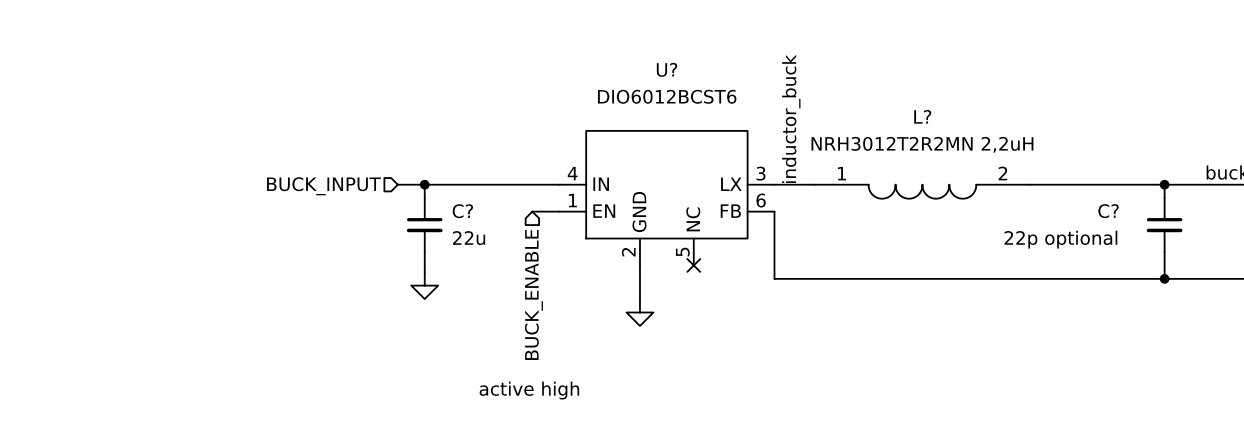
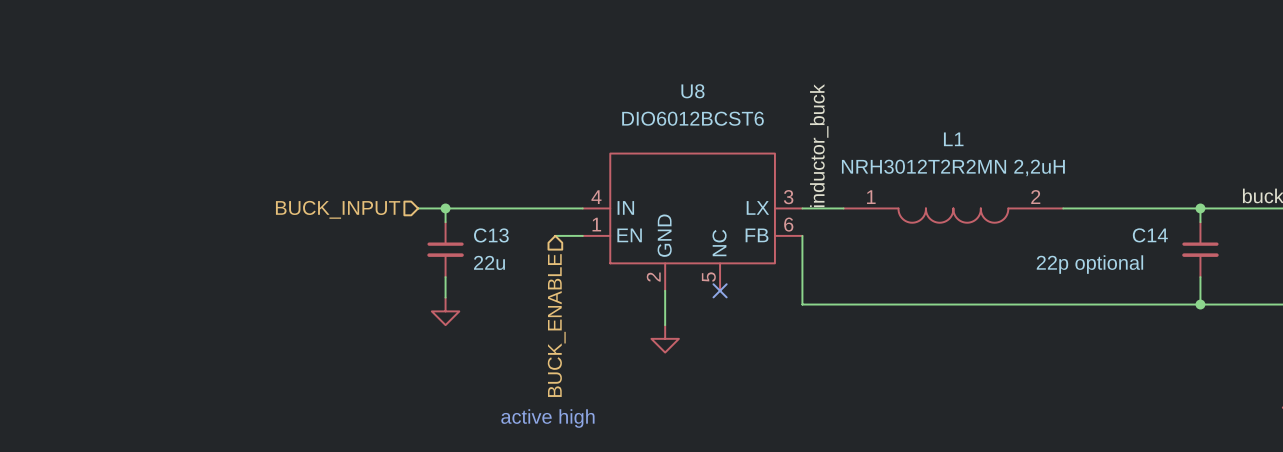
U? name: U? (667, 69) -> U8 (692, 91)
L? name: L? (922, 116) -> L1 (953, 139)
C? name: C? (462, 211) -> C13 (491, 235)
C? name: C? (1108, 211) -> C14 (1150, 235)

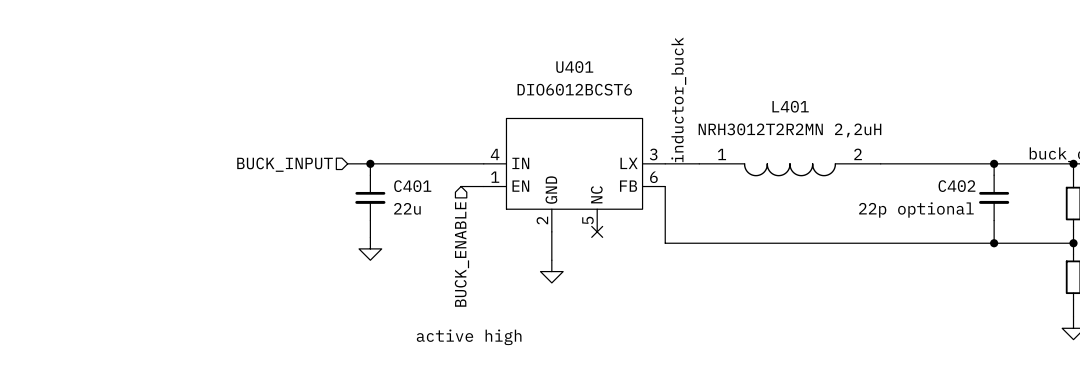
U8 name: U8 (692, 91) -> U401 (574, 67)
L1 name: L1 (953, 139) -> L401 (790, 106)
C13 name: C13 (491, 235) -> C401 (412, 186)
C14 name: C14 (1150, 235) -> C402 (956, 186)

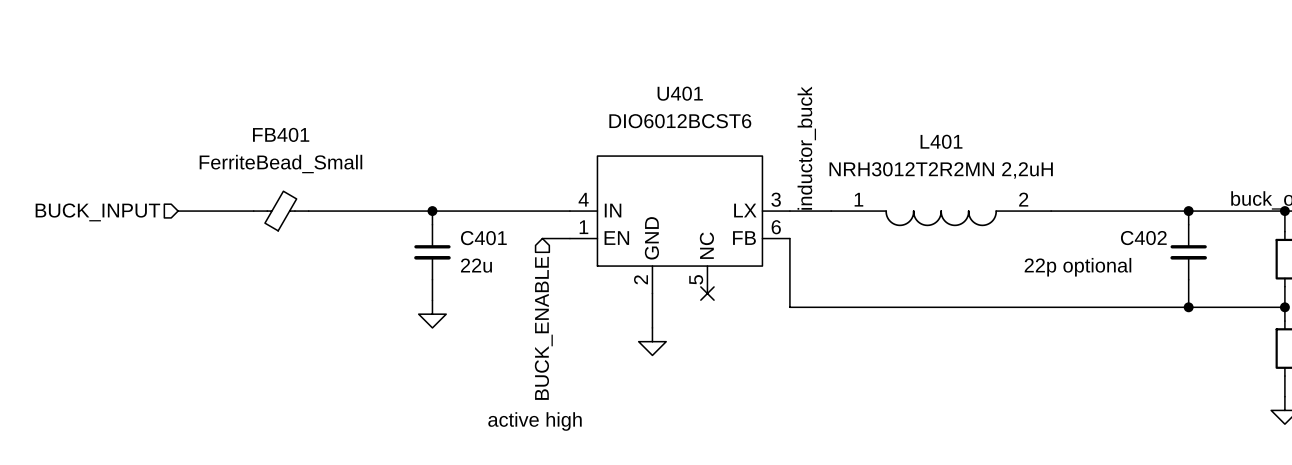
wire: none -> (178, 211) (253, 211)
FB401: none -> FerriteBead_Small (281, 211)
wire: none -> (308, 211) (404, 211)
hierarchical label position: BUCK_INPUT (285, 164) -> BUCK_INPUT (97, 212)

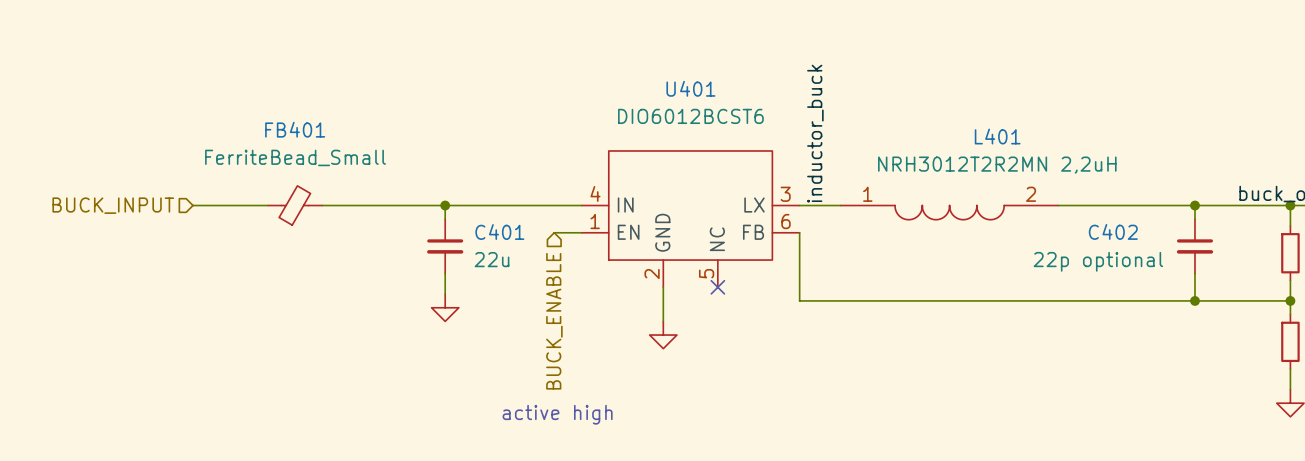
L401 name position: L401 (941, 141) -> L401 (997, 136)
L401 value position: NRH3012T2R2MN 2,2uH (941, 170) -> NRH3012T2R2MN 2,2uH (997, 165)
C402 name position: C402 (1143, 238) -> C402 (1113, 231)

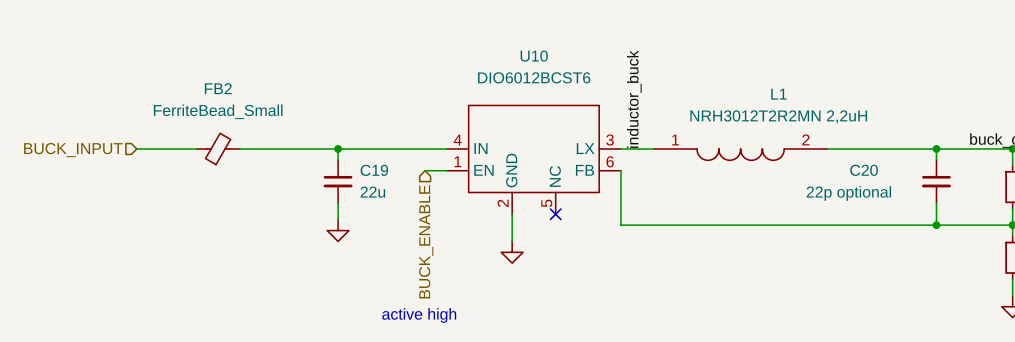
U401 name: U401 (690, 88) -> U10 (534, 56)
FB401 name: FB401 (295, 129) -> FB2 (218, 88)
L401 name: L401 (997, 136) -> L1 (778, 94)
C402 name: C402 (1113, 231) -> C20 (864, 170)
C401 name: C401 (499, 232) -> C19 (374, 170)

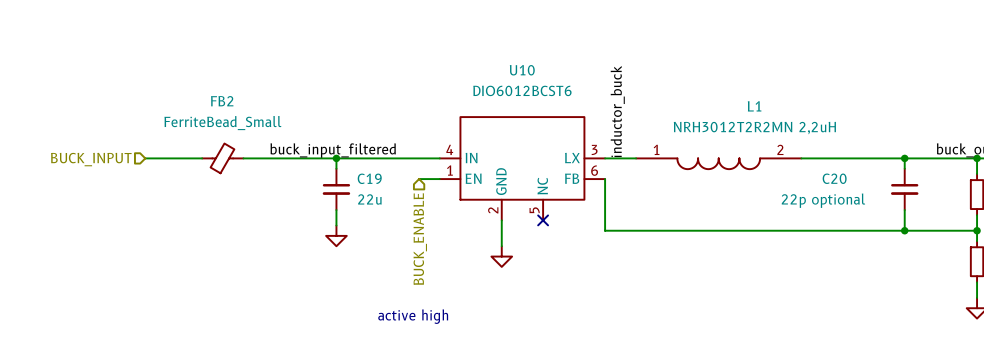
label: none -> buck_input_filtered (333, 150)

